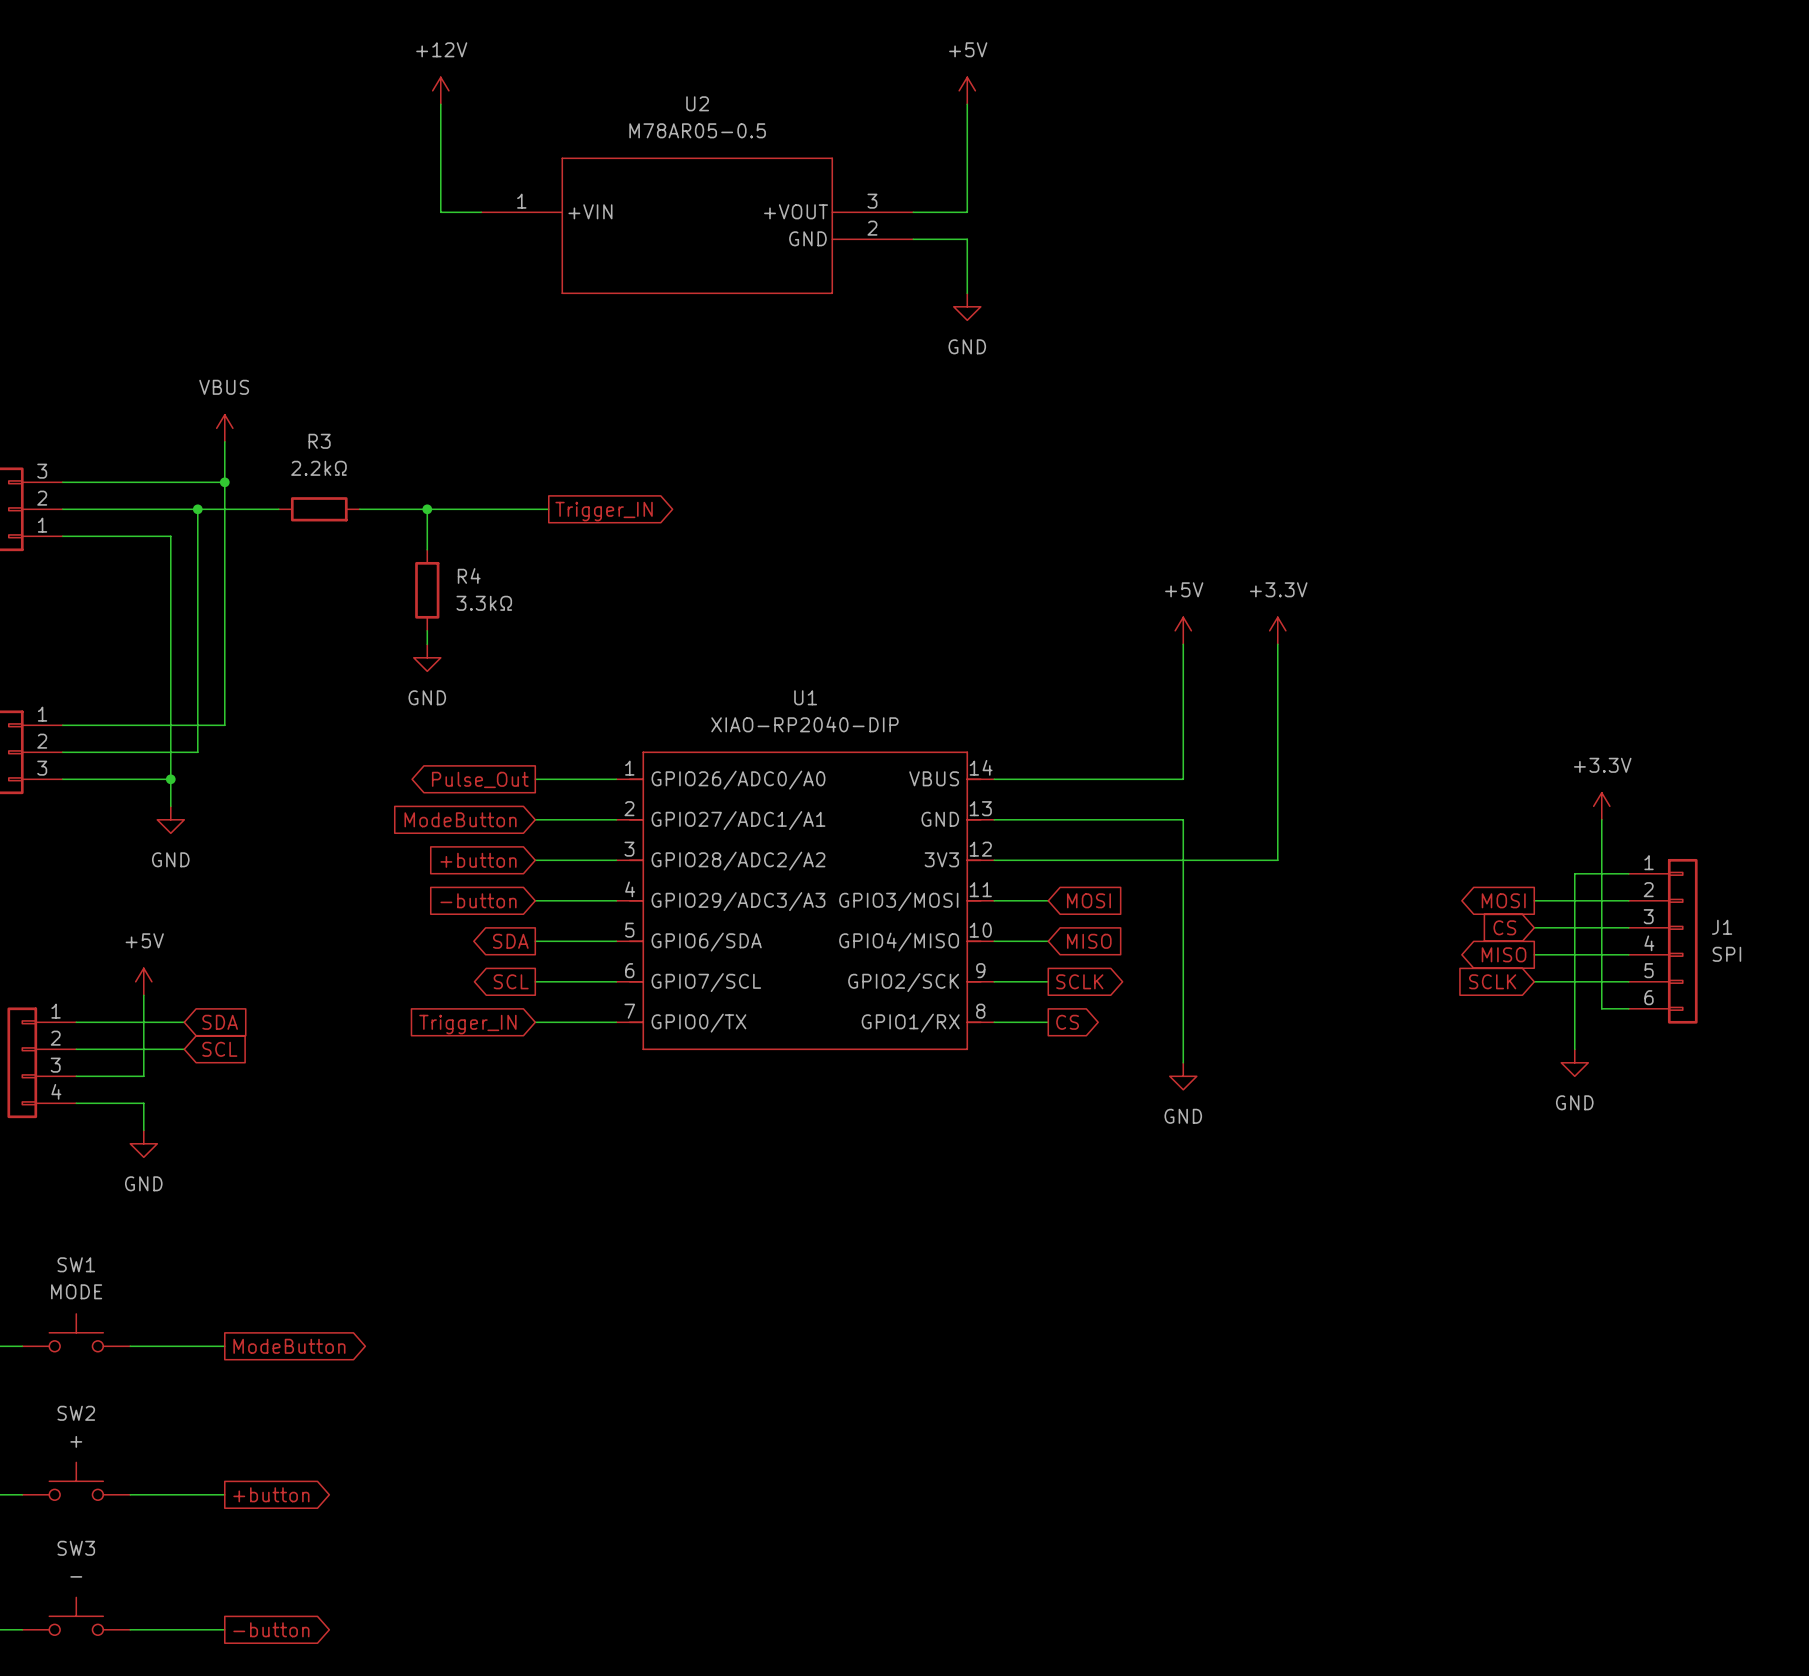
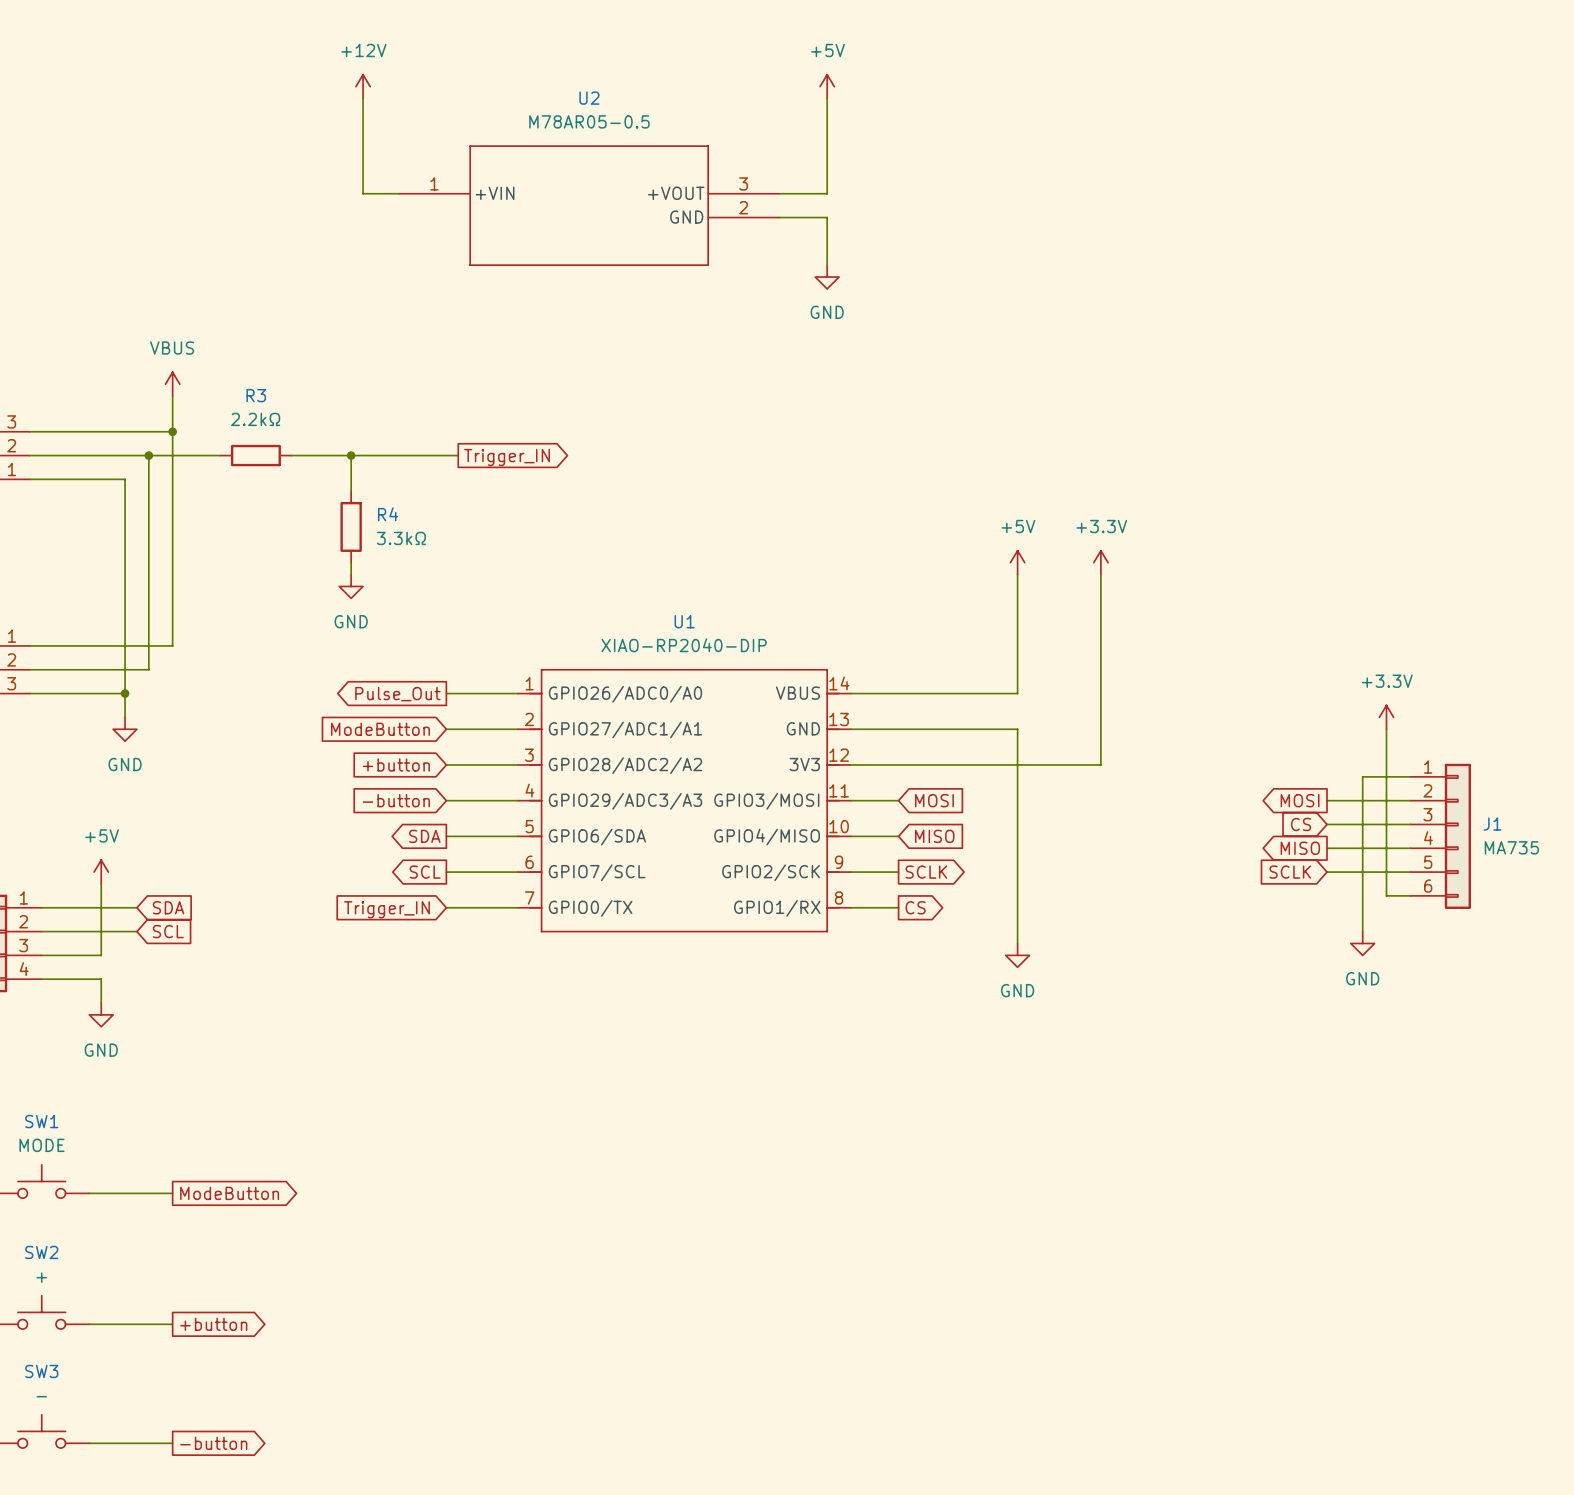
J1 value: SPI (1726, 954) -> MA735 (1511, 847)

